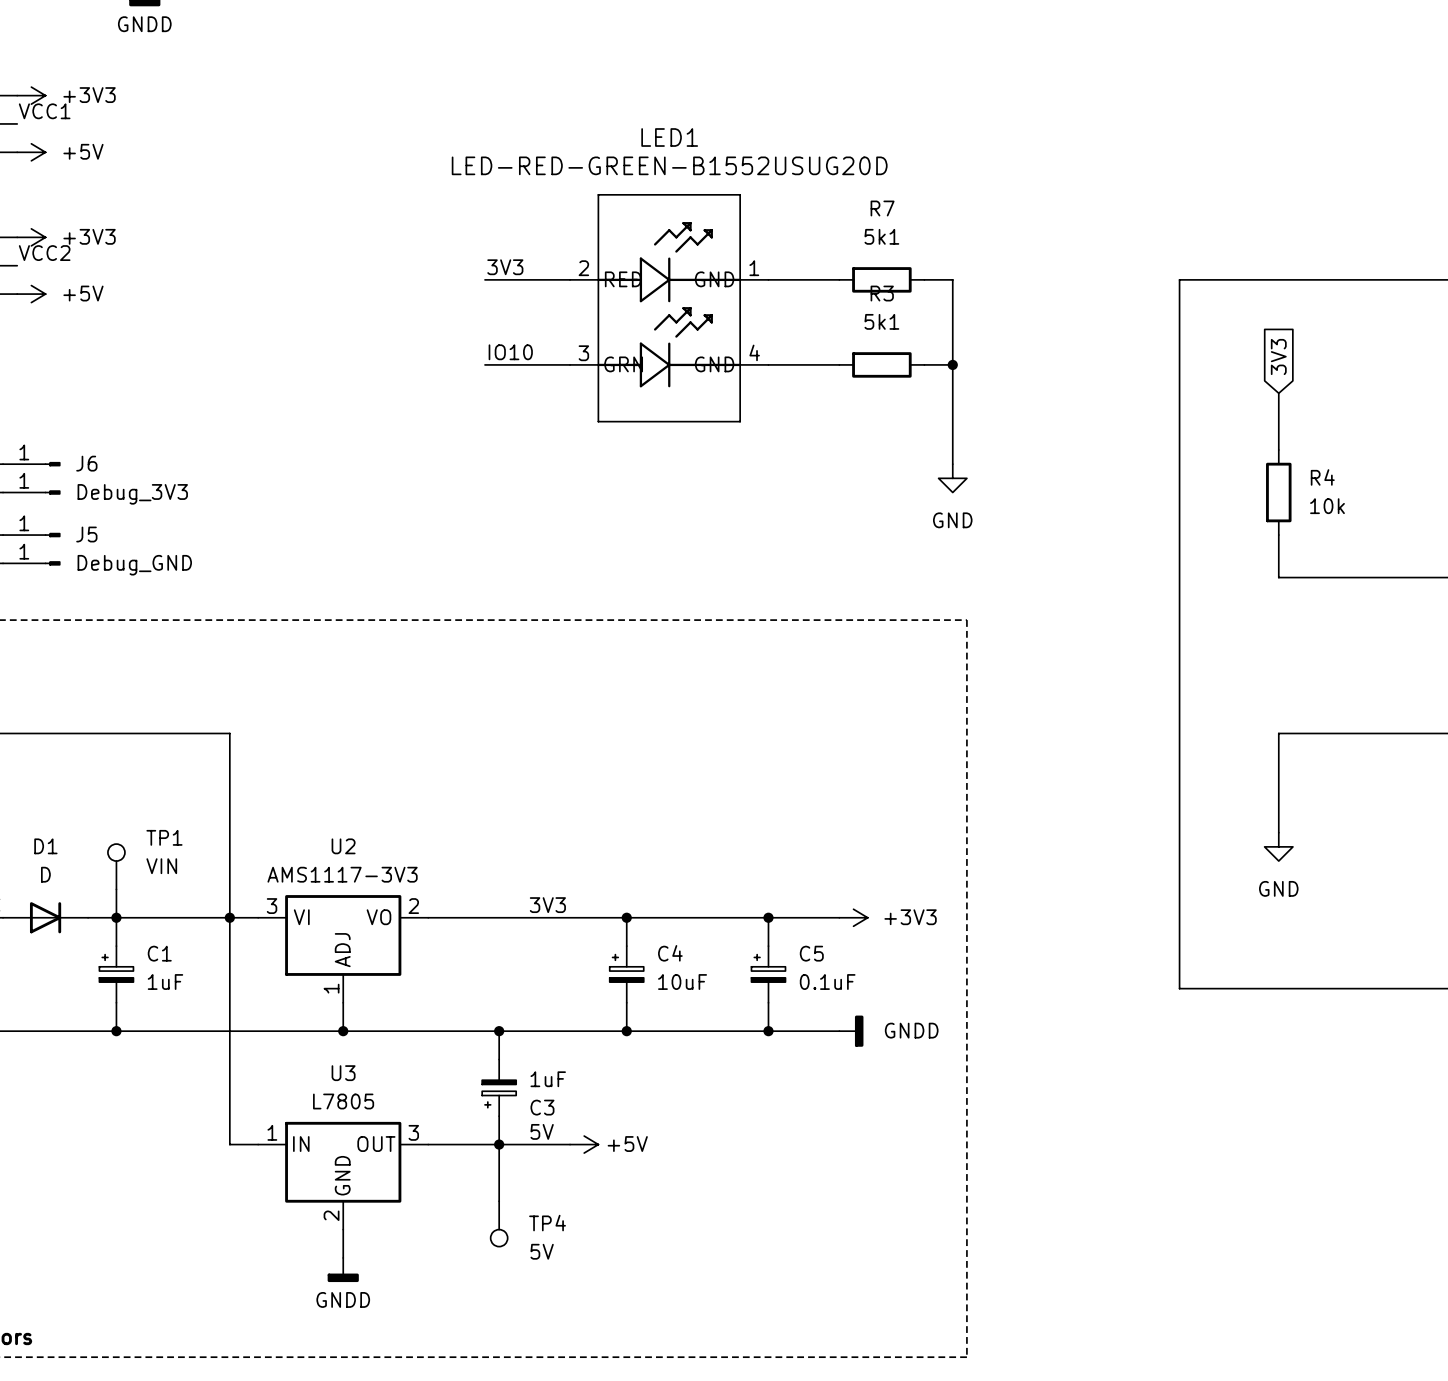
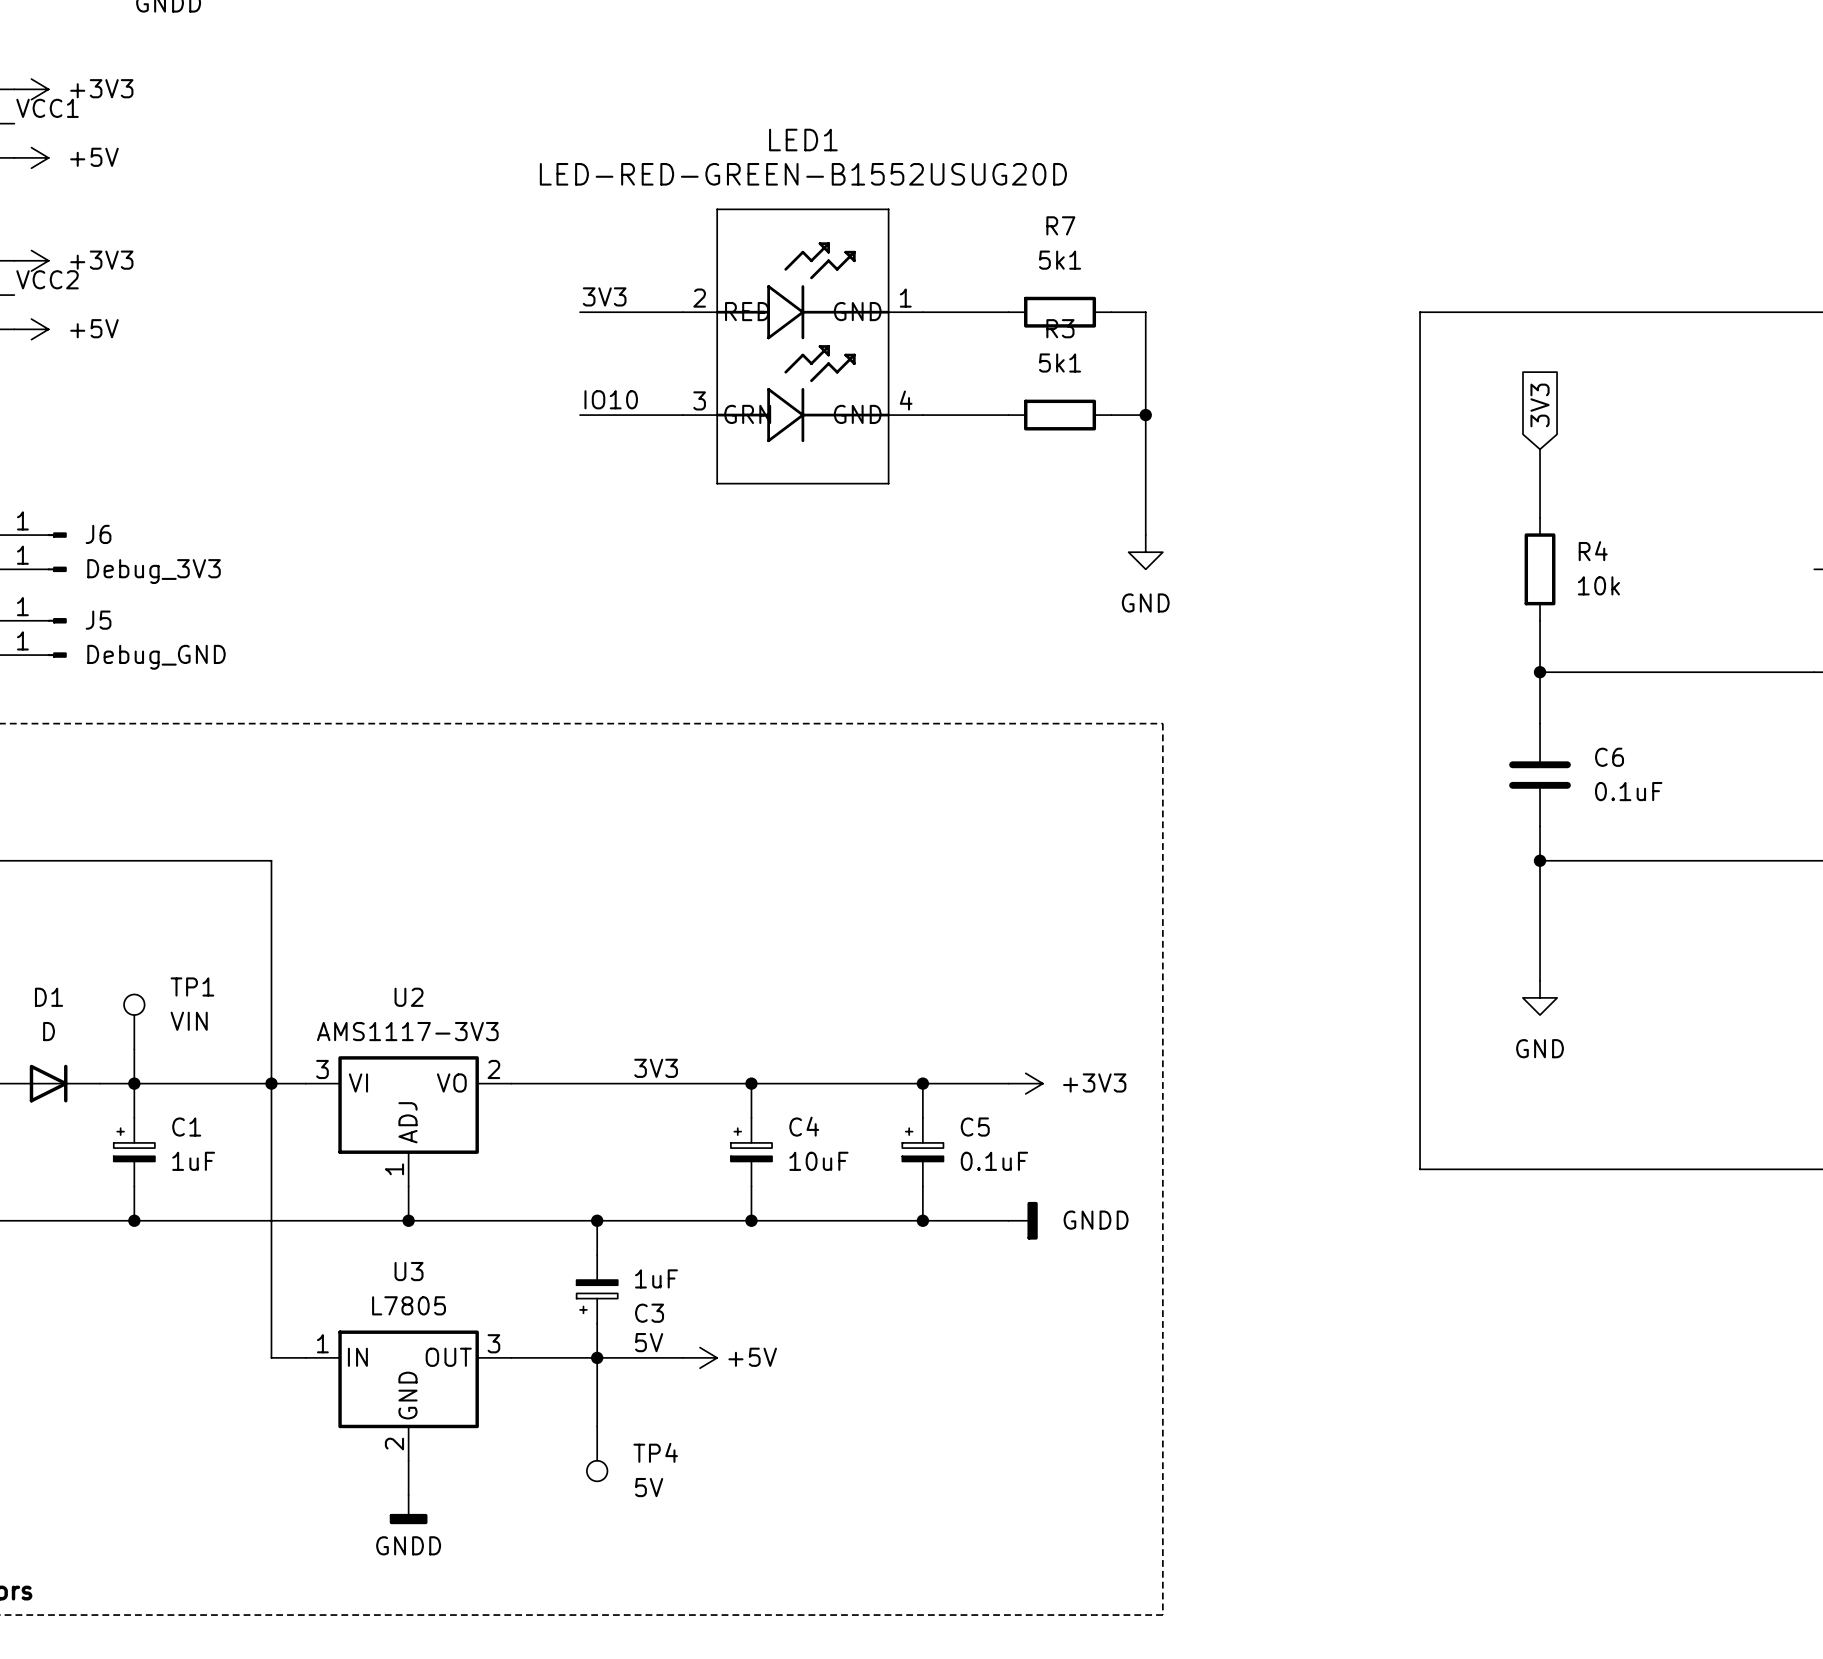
wire: none -> (1540, 672) (1540, 723)
junction: none -> (1540, 672)
C6: none -> 0.1uF (1540, 775)
wire: none -> (1540, 826) (1540, 860)
junction: none -> (1540, 860)

